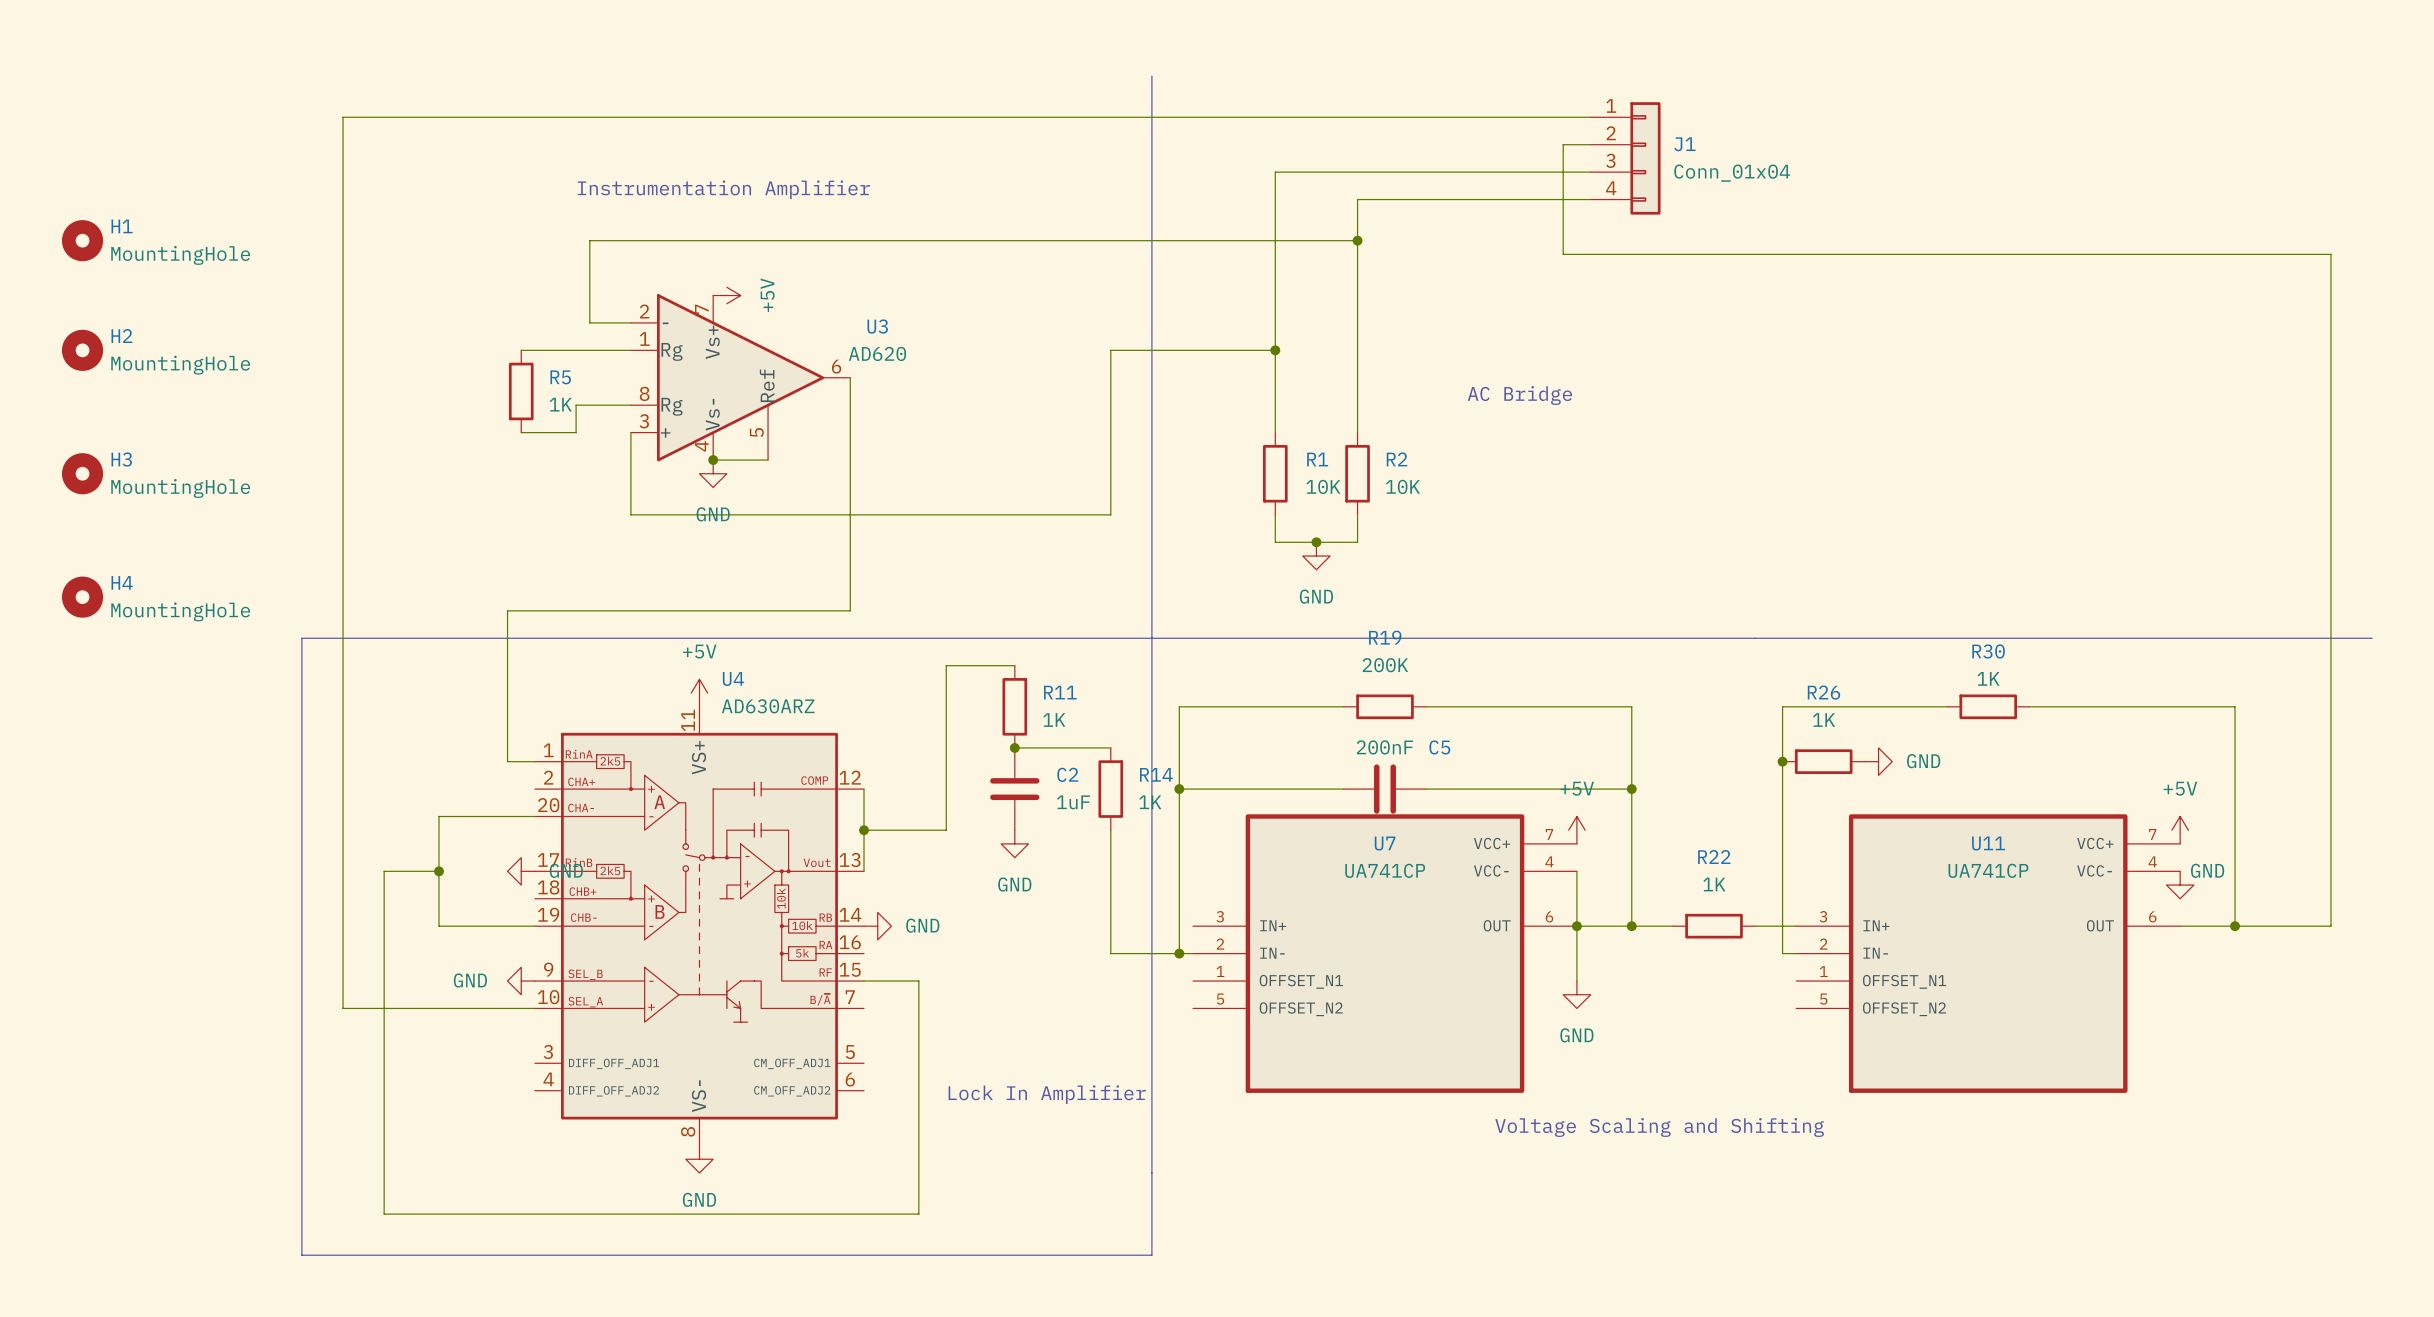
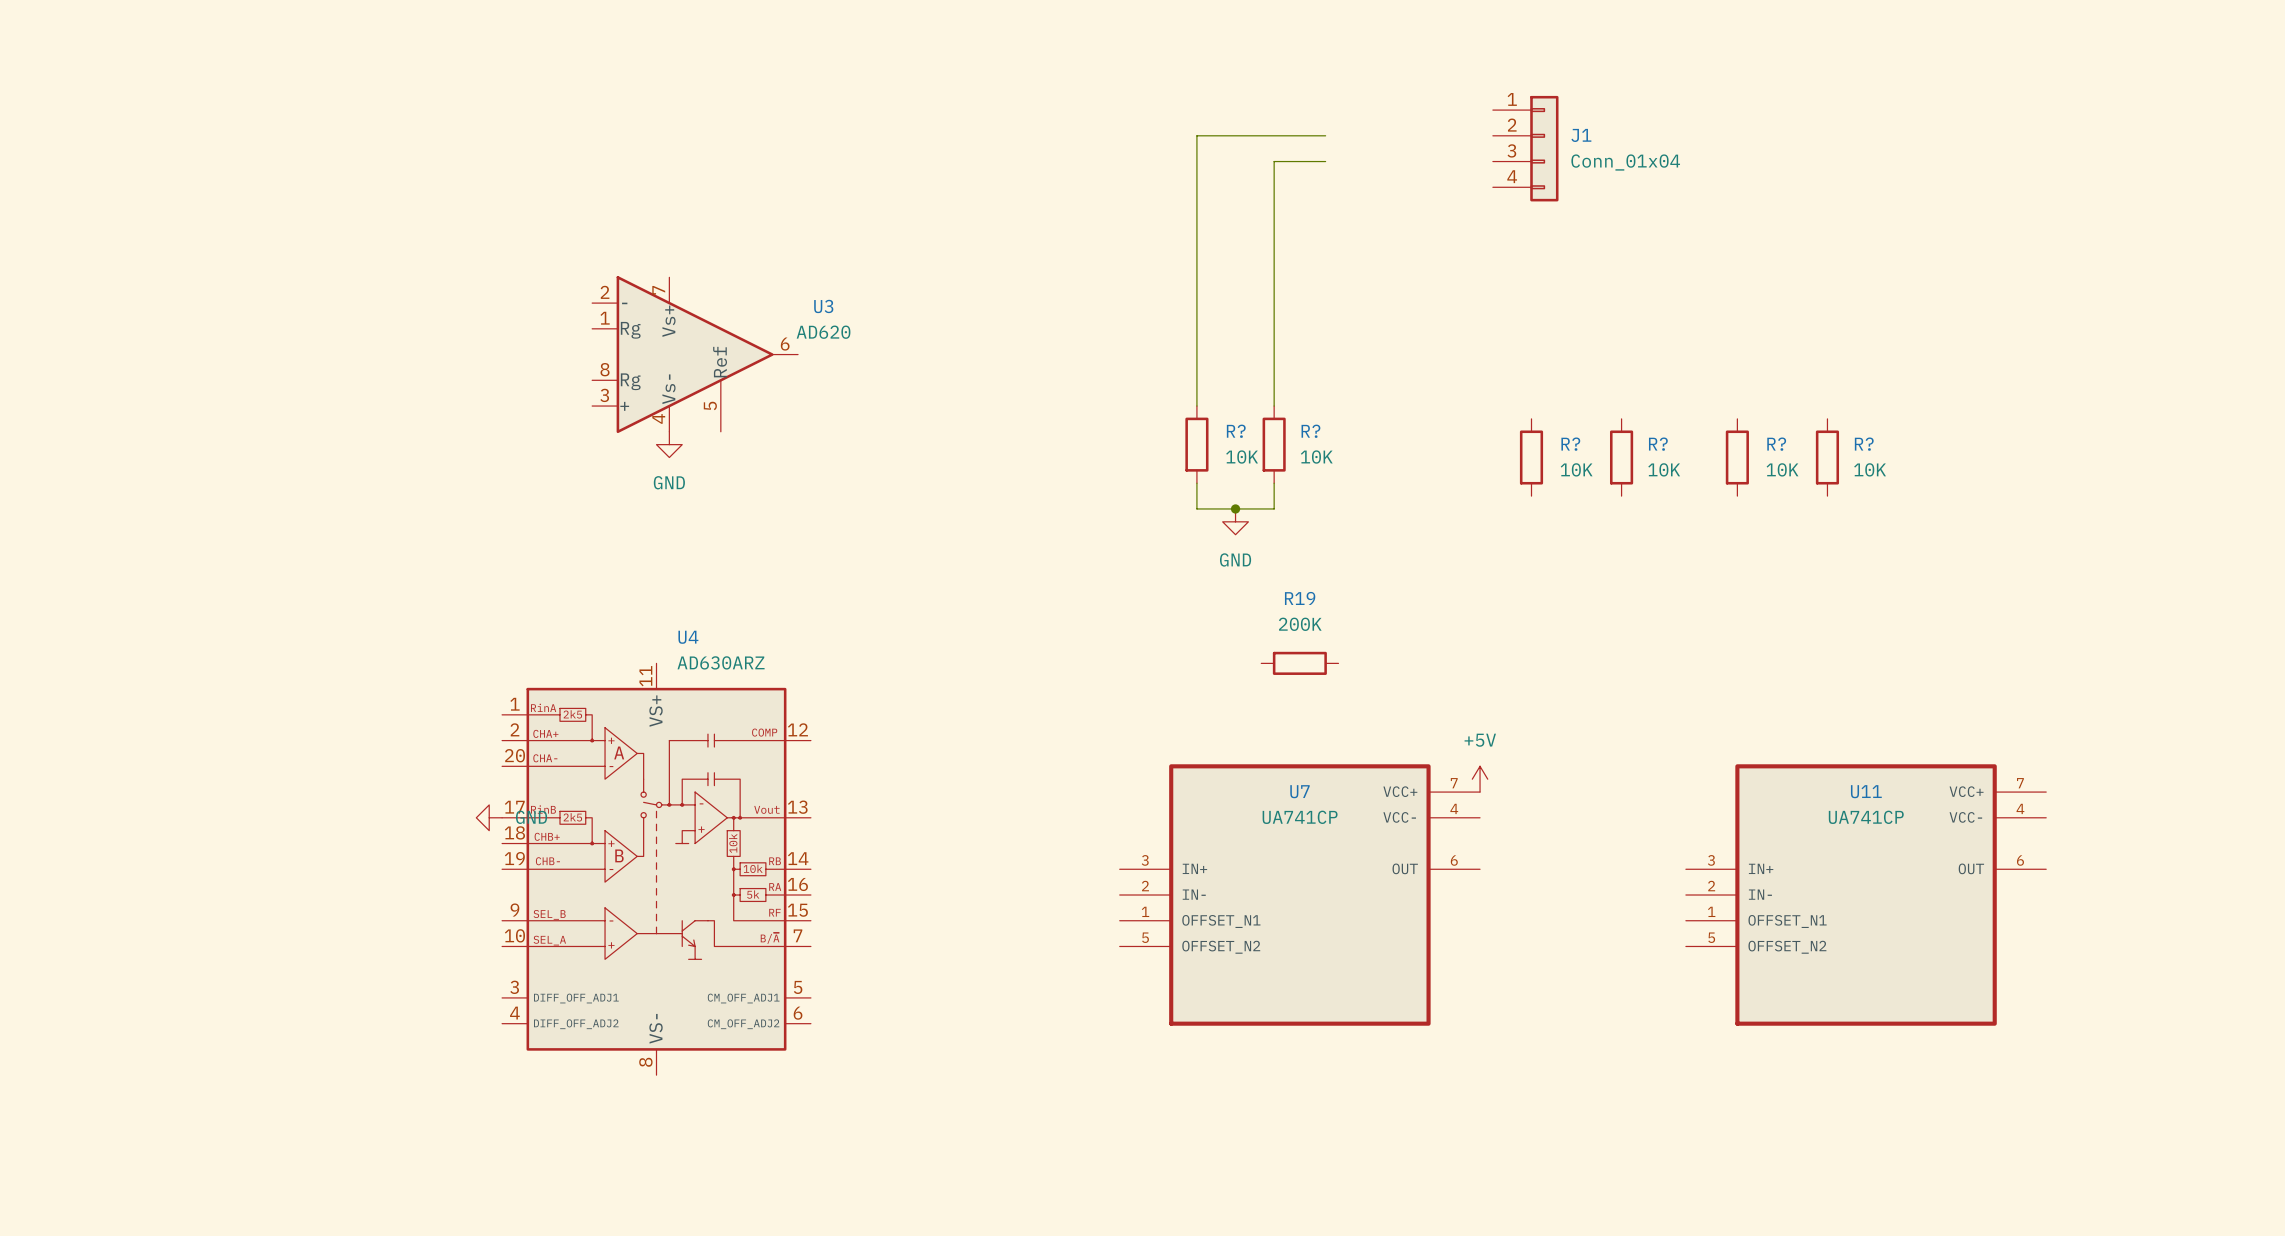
line: (1151, 76) (1151, 1255) (301, 1255) (301, 638) (2372, 638) -> none
wire: (1590, 117) (343, 117) (343, 1008) (534, 1008) -> none
wire: (1590, 144) (1563, 144) (1563, 254) (2330, 254) (2330, 926) (2180, 926) -> none
wire: (1275, 172) (1357, 172) -> (1196, 161) (1196, 135) (1325, 135)
wire: (1412, 172) (1590, 172) -> none
text: Instrumentation Amplifier (723, 189) -> none
wire: (1357, 199) (1590, 199) -> (1274, 187) (1274, 161)
H1: MountingHole (82, 240) -> none
wire: (1357, 240) (589, 240) (589, 322) (630, 322) -> none
junction: (1357, 240) -> none
power symbol: +5V (726, 295) -> none
H2: MountingHole (82, 350) -> none
wire: (521, 350) (630, 350) -> none
wire: (1275, 350) (1110, 350) (1110, 514) (630, 514) (630, 432) -> none
junction: (1275, 350) -> none
wire: (850, 377) (850, 610) (507, 610) (507, 761) (534, 761) -> none
R5: 1K (521, 391) -> none
text: AC Bridge (1519, 395) -> none
wire: (630, 405) (576, 405) (576, 432) (521, 432) -> none
R1 name: R1 (1317, 459) -> R? (1236, 431)
R2 name: R2 (1397, 459) -> R? (1310, 431)
wire: (713, 460) (768, 460) -> none
junction: (713, 460) -> none
H3: MountingHole (82, 473) -> none
R?: none -> 10K (1531, 457)
R?: none -> 10K (1621, 457)
R?: none -> 10K (1737, 457)
R?: none -> 10K (1827, 457)
H4: MountingHole (82, 597) -> none
wire: (1014, 665) (946, 665) (946, 830) (864, 830) -> none
power symbol: +5V (699, 693) -> none
R11: 1K (1014, 706) -> none
wire: (1343, 706) (1179, 706) (1179, 953) -> none
wire: (1426, 706) (1631, 706) (1631, 926) -> none
wire: (1947, 706) (1782, 706) (1782, 953) (1796, 953) -> none
R30: 1K (1988, 706) -> none
wire: (2029, 706) (2235, 706) (2235, 926) -> none
wire: (1014, 747) (1110, 747) -> none
junction: (1014, 747) -> none
junction: (1782, 761) -> none
R26: 1K (1823, 761) -> none
power symbol: GND (1878, 761) -> none
wire: (864, 789) (864, 871) -> none
C2: 1uF (1014, 789) -> none
R14: 1K (1110, 789) -> none
wire: (1179, 789) (1343, 789) -> none
junction: (1179, 789) -> none
C5: 200nF (1384, 789) -> none
wire: (1426, 789) (1631, 789) -> none
junction: (1631, 789) -> none
wire: (534, 816) (438, 816) (438, 926) (534, 926) -> none
junction: (864, 830) -> none
wire: (1110, 830) (1110, 953) (1193, 953) -> none
power symbol: +5V (2180, 830) -> none
power symbol: GND (1014, 843) -> none
wire: (438, 871) (384, 871) (384, 1214) (918, 1214) (918, 981) (864, 981) -> none
junction: (438, 871) -> none
wire: (1576, 871) (1576, 981) -> none
power symbol: GND (2180, 885) -> none
power symbol: GND (877, 926) -> none
wire: (1576, 926) (1672, 926) -> none
junction: (1576, 926) -> none
junction: (1631, 926) -> none
R22: 1K (1714, 926) -> none
wire: (1755, 926) (1796, 926) -> none
junction: (2235, 926) -> none
junction: (1179, 953) -> none
power symbol: GND (521, 981) -> none
power symbol: GND (1576, 994) -> none
text: Lock In Amplifier (1047, 1094) -> none
text: Voltage Scaling and Shifting (1659, 1127) -> none
power symbol: GND (699, 1159) -> none

